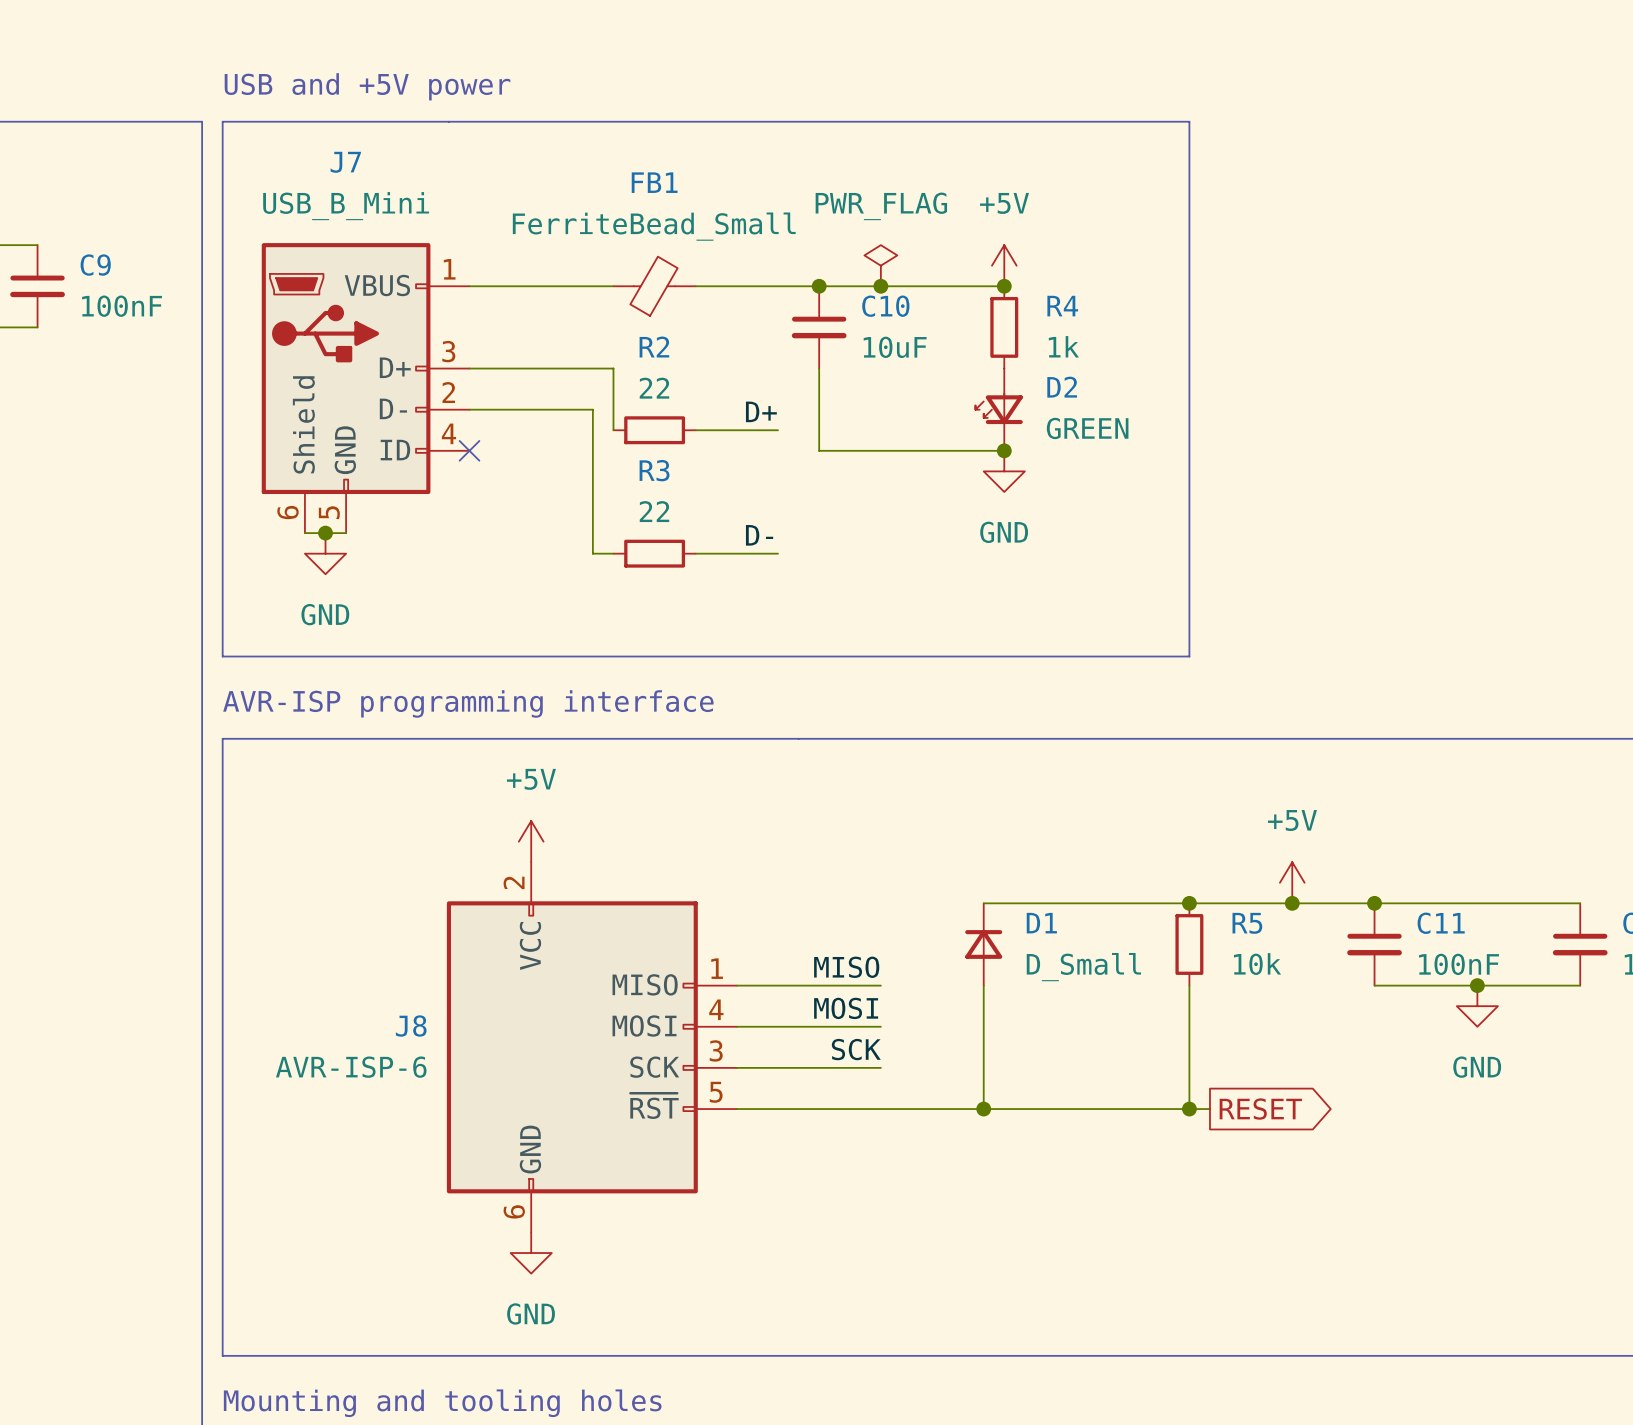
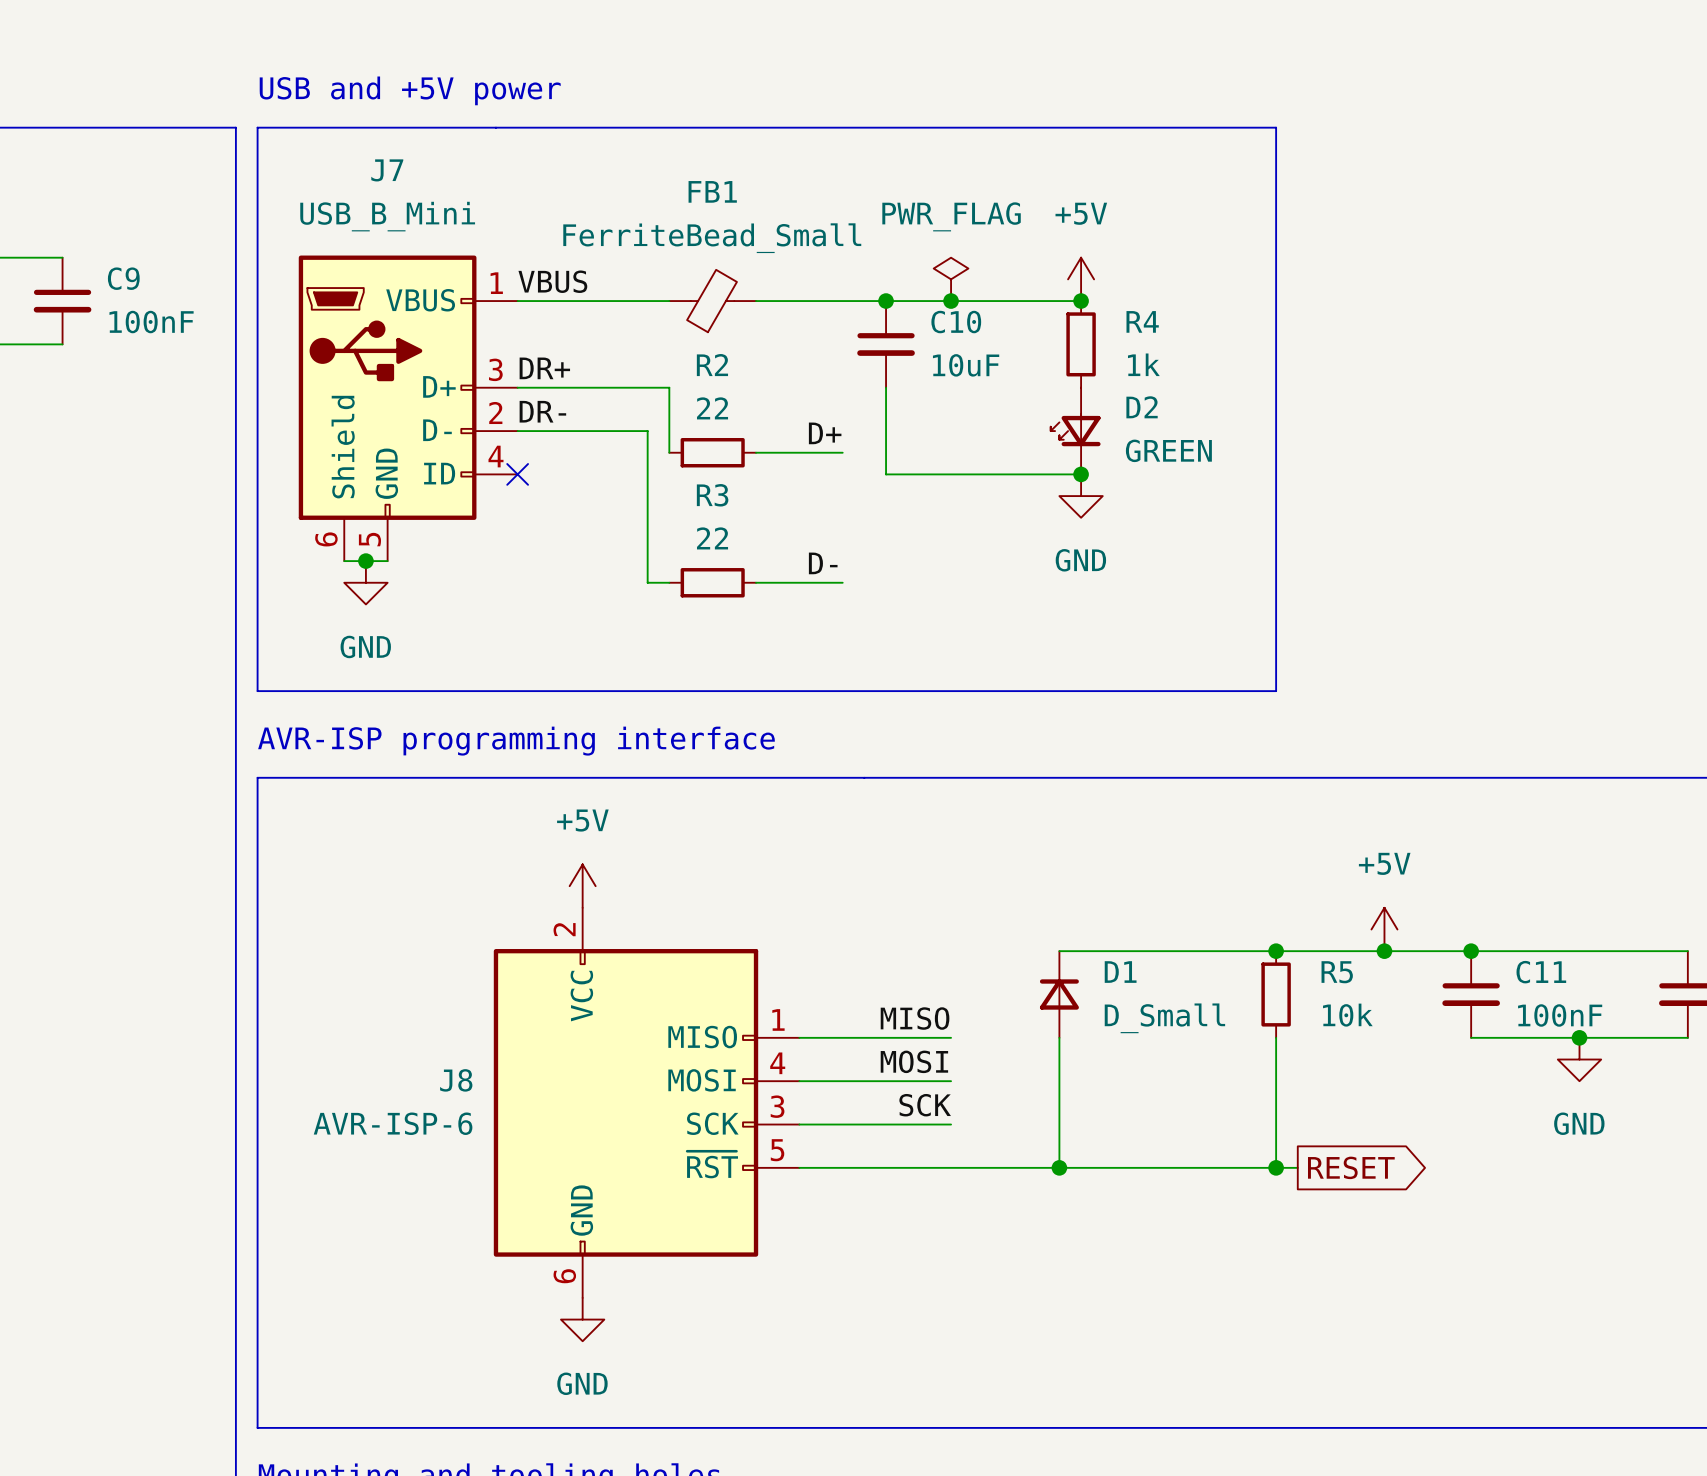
label: none -> VBUS (552, 281)
label: none -> DR+ (544, 368)
label: none -> DR- (542, 411)

